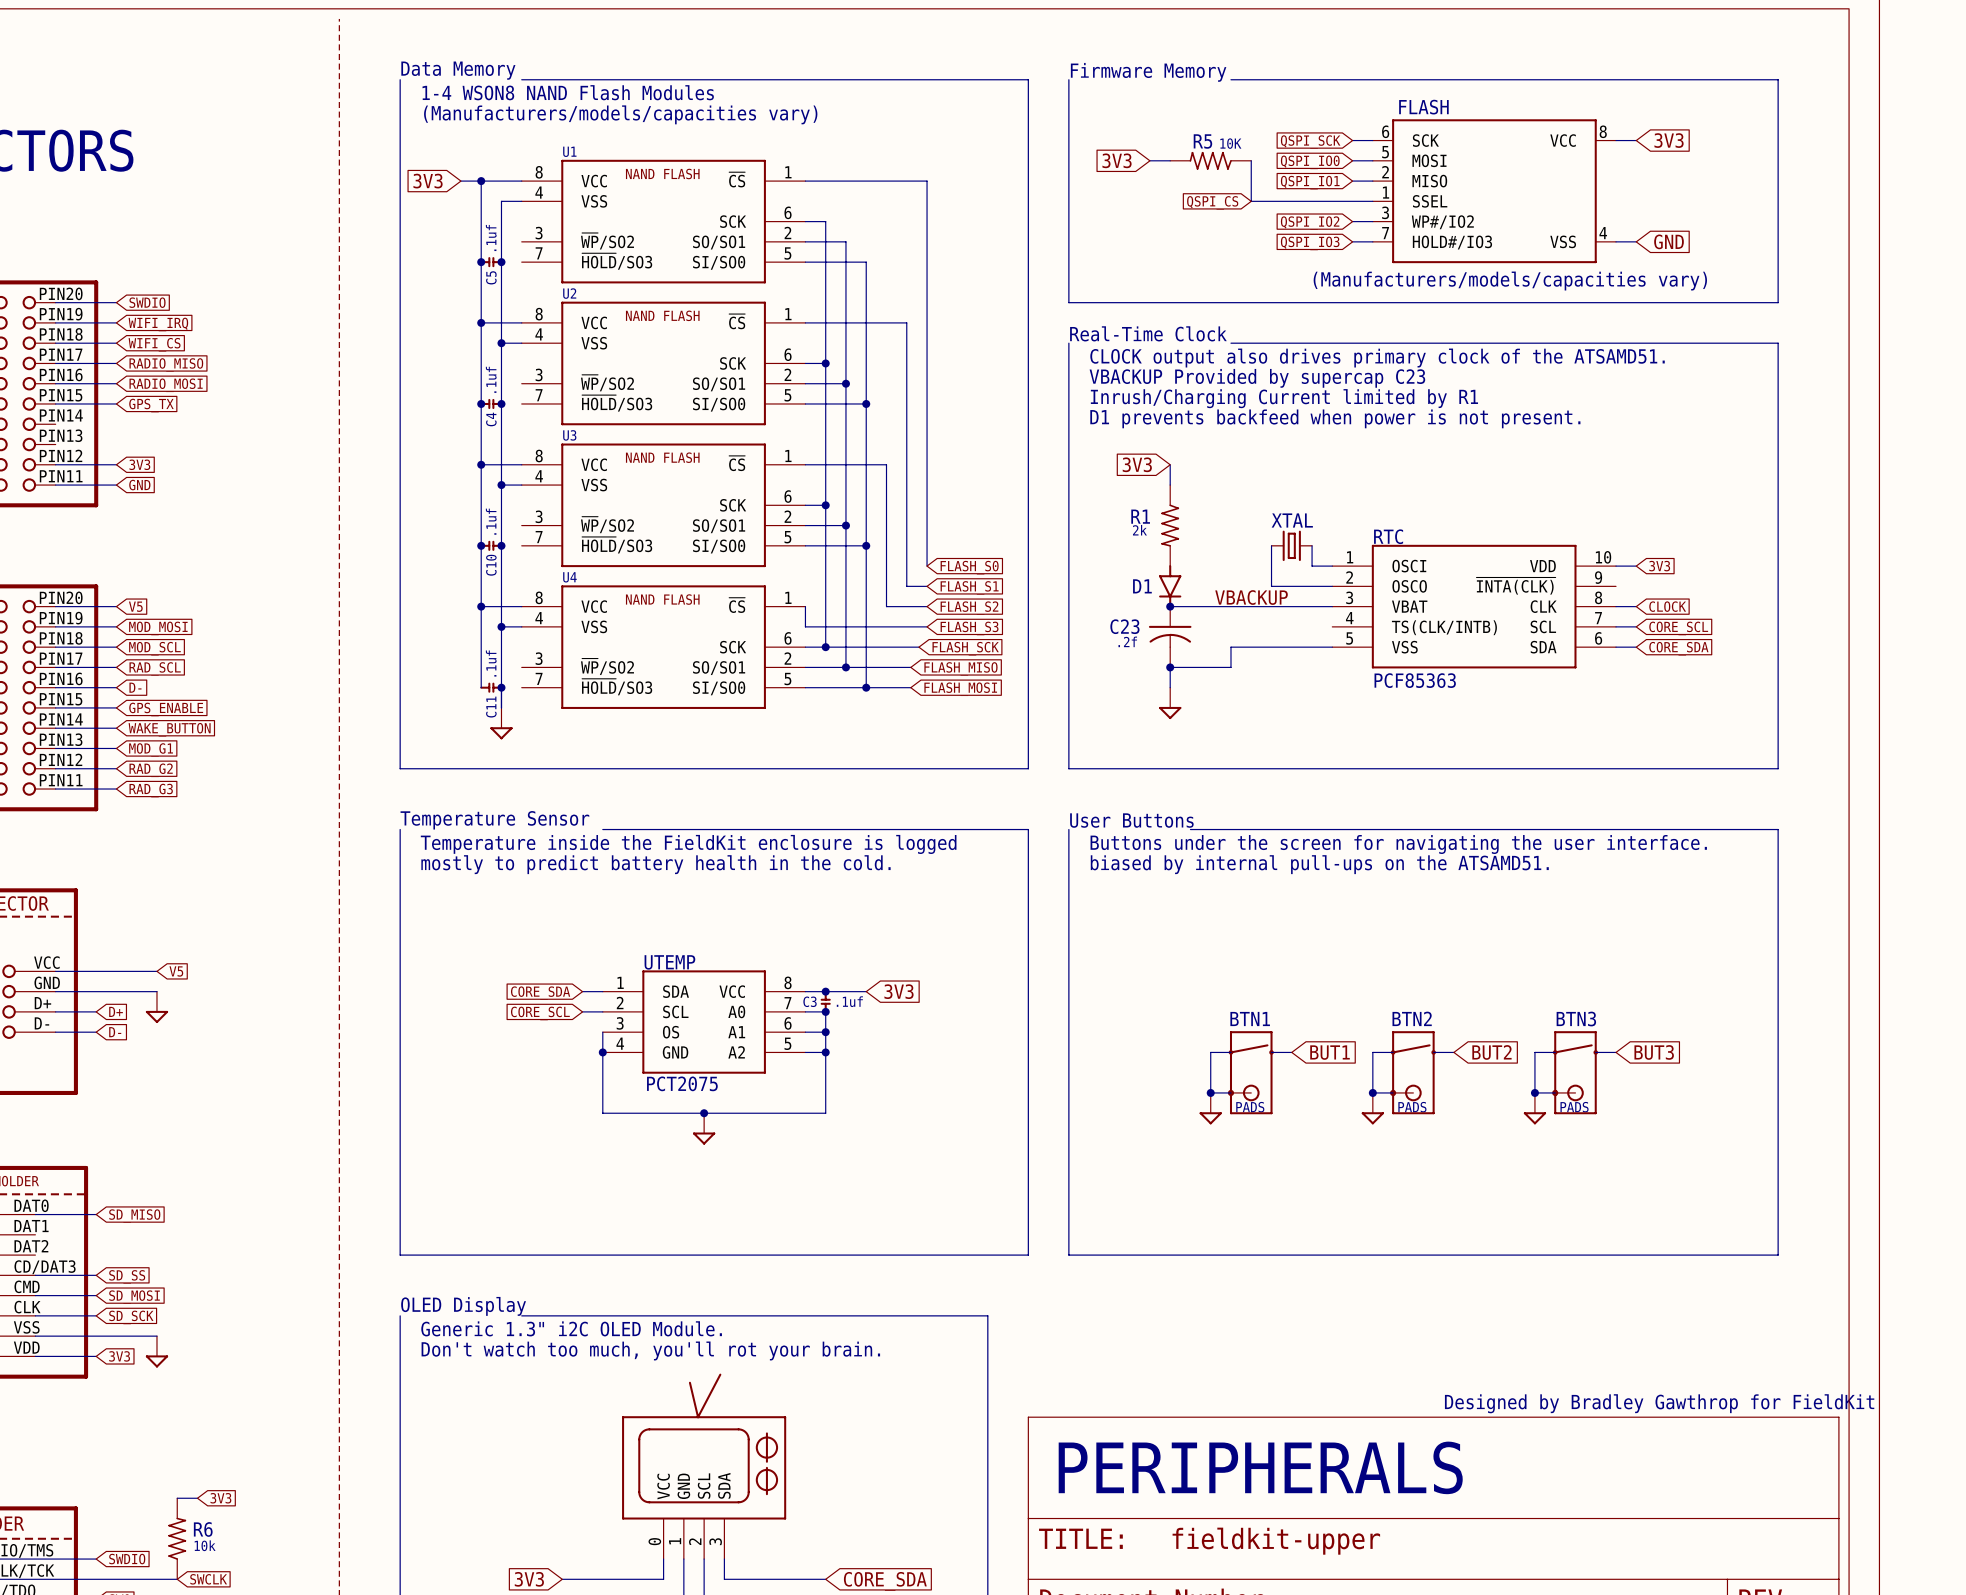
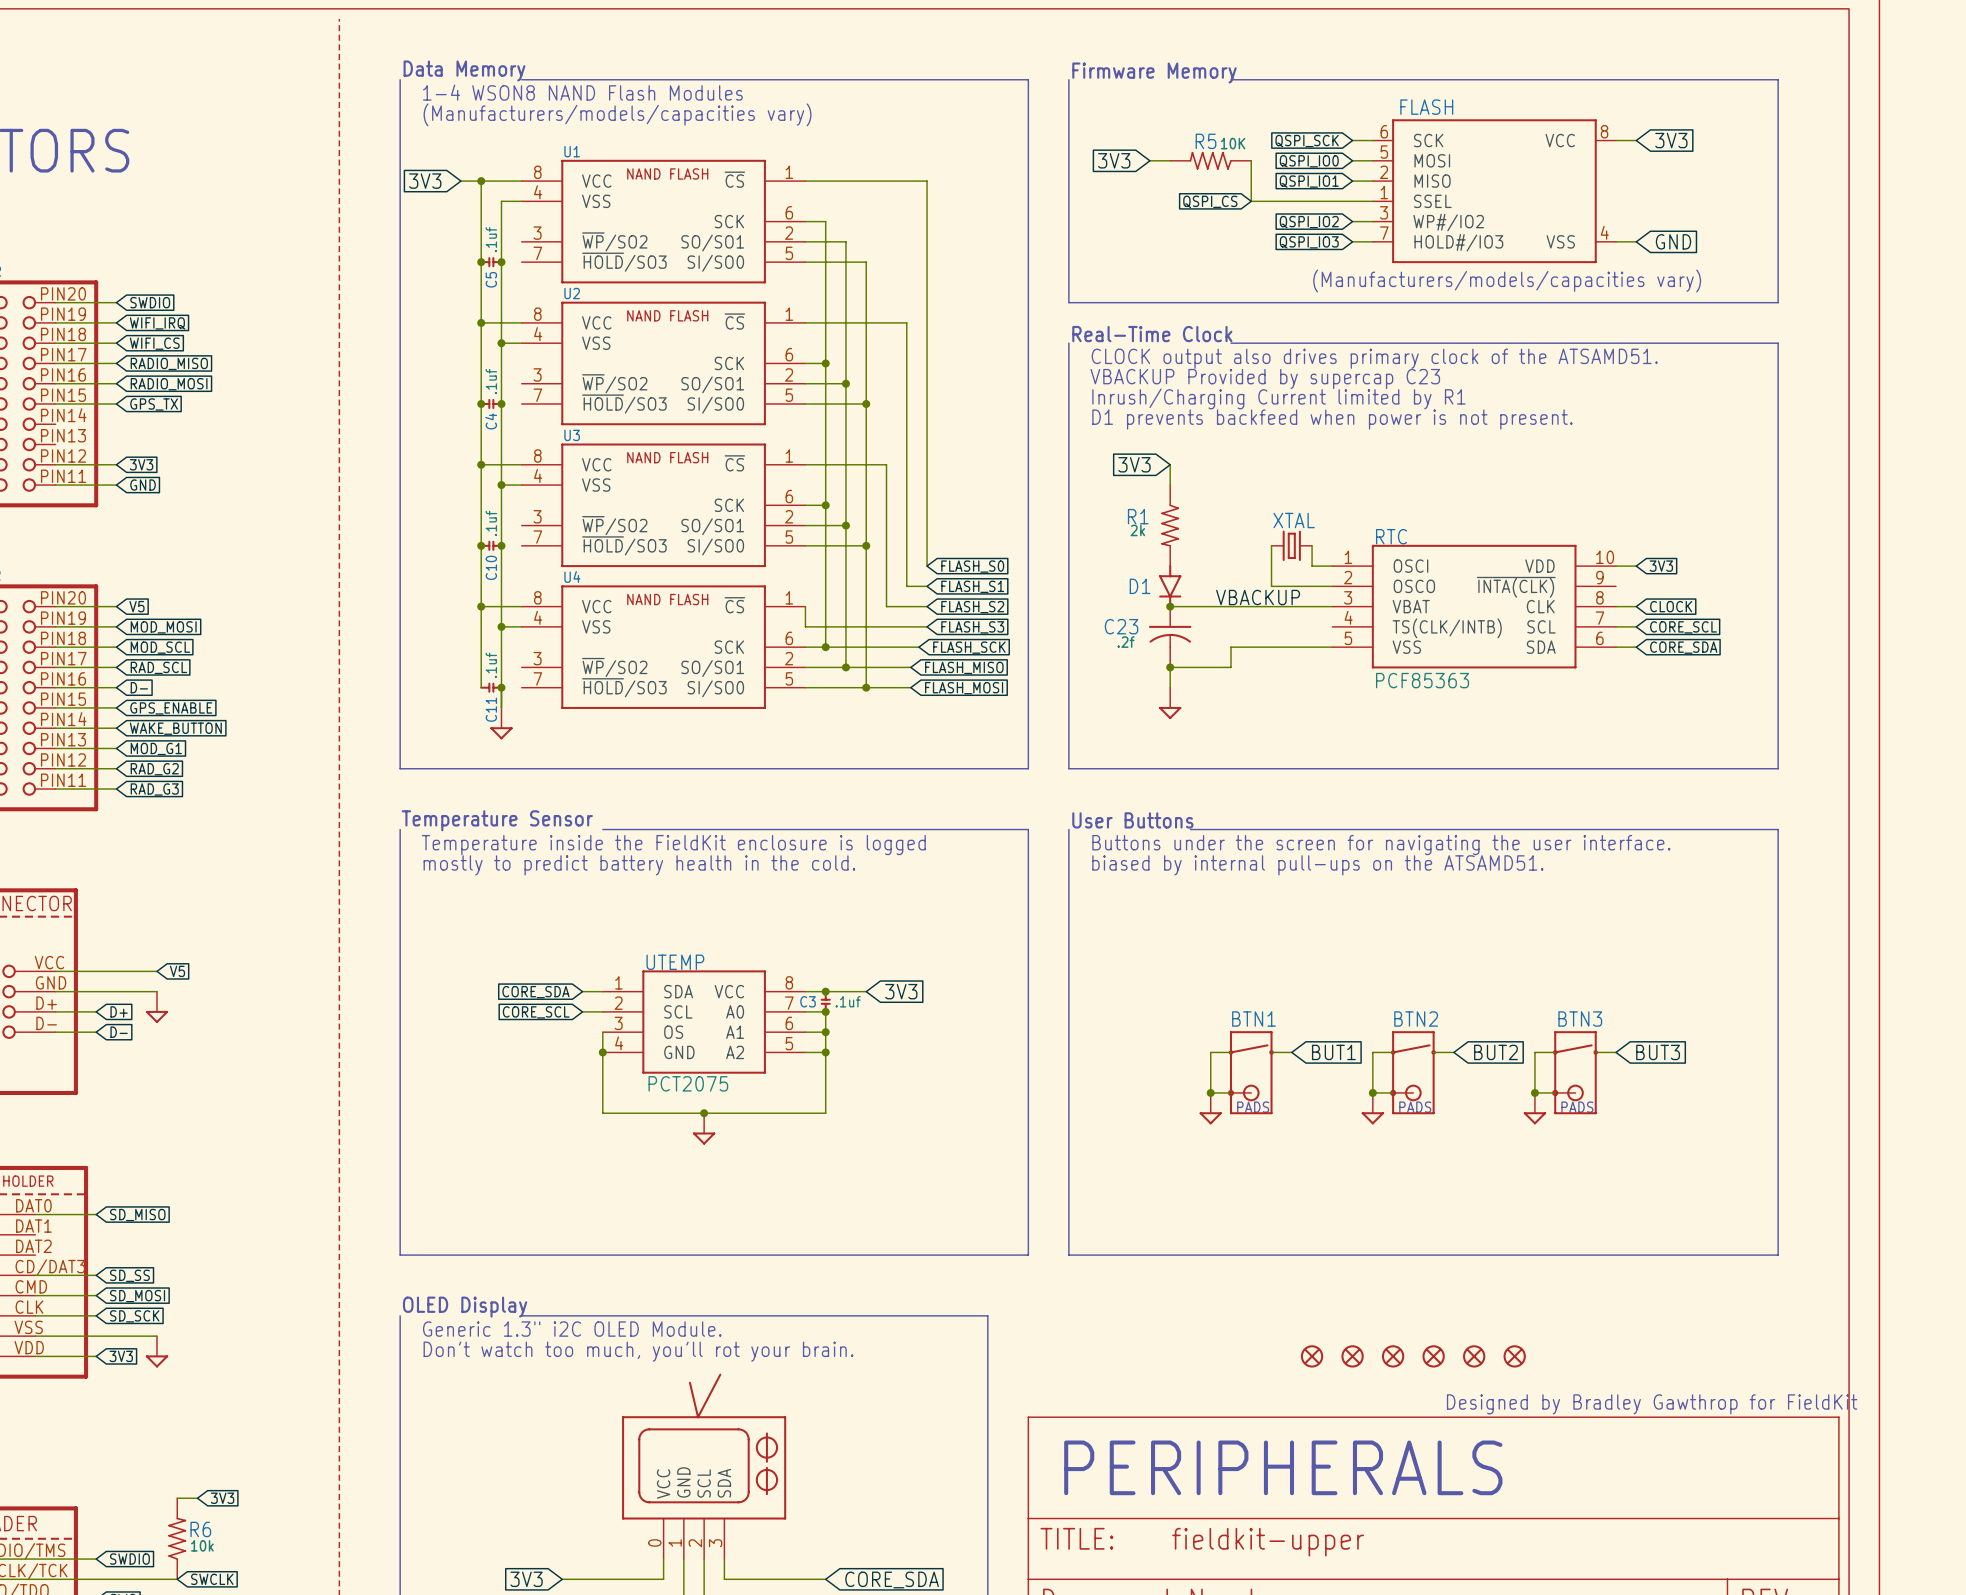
part: none -> (1312, 1356)
part: none -> (1352, 1356)
part: none -> (1393, 1356)
part: none -> (1433, 1356)
part: none -> (1474, 1356)
part: none -> (1514, 1356)

